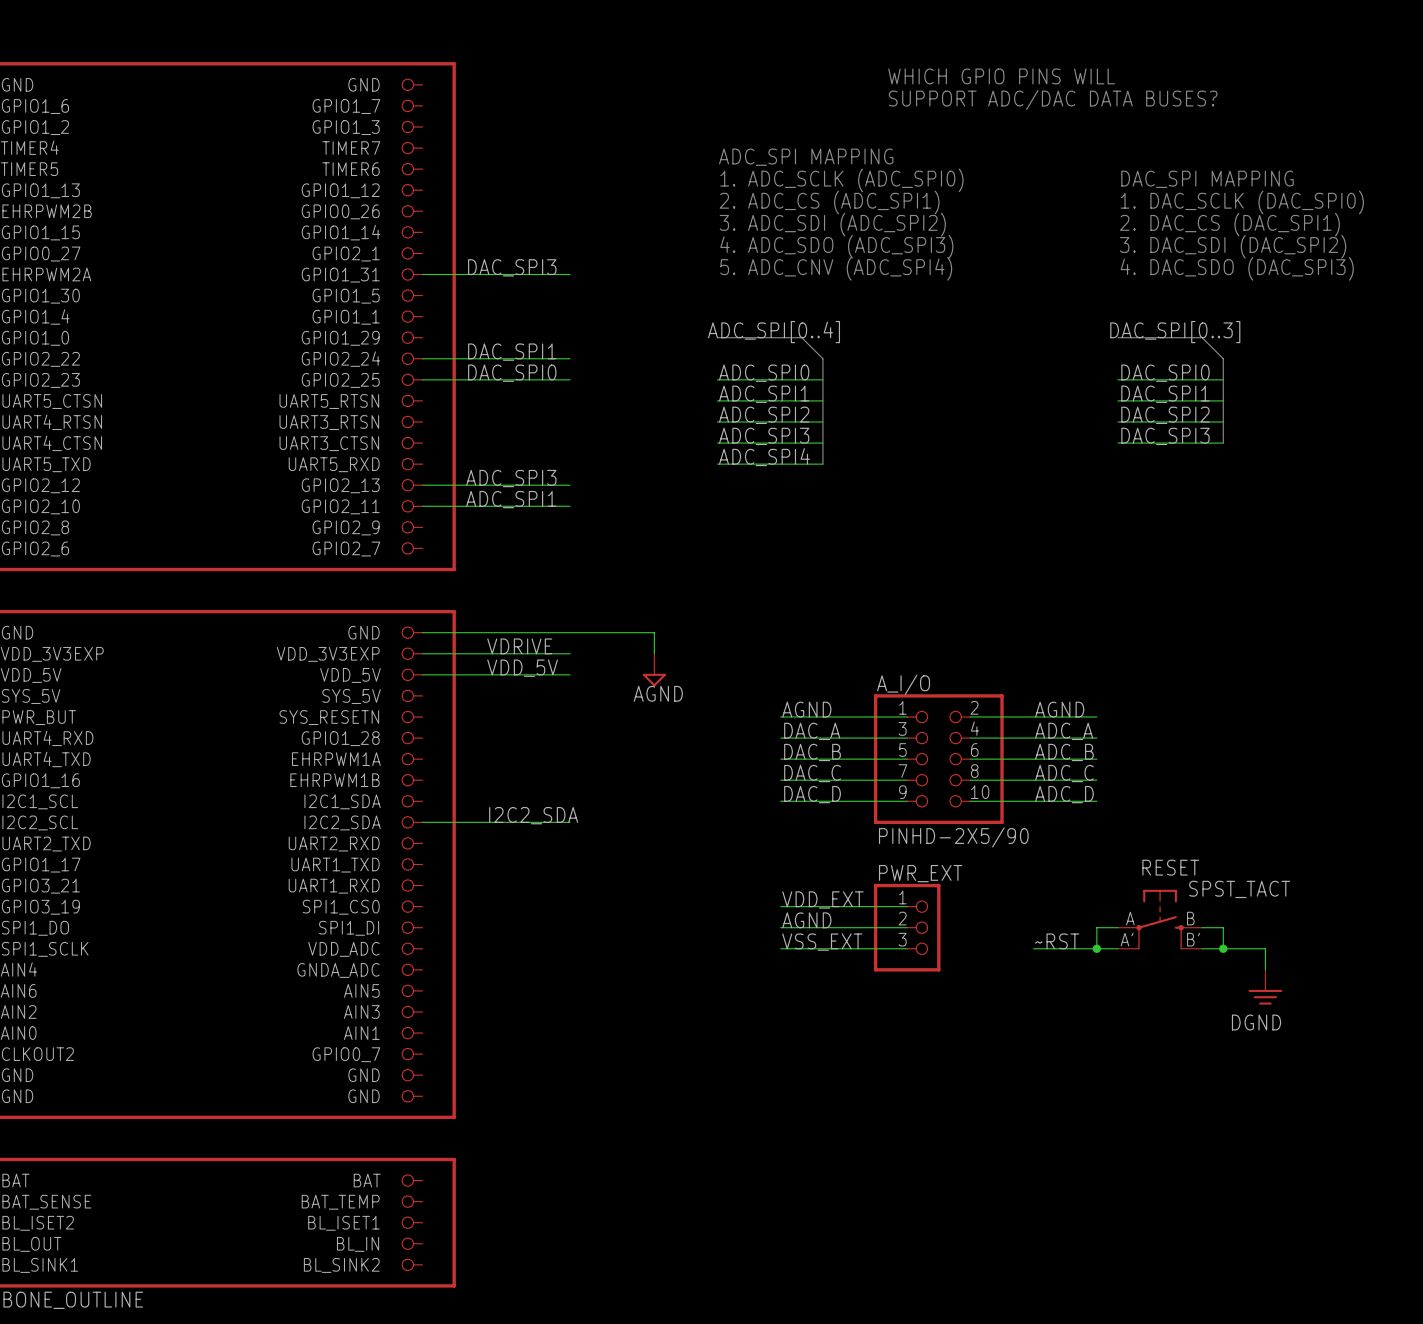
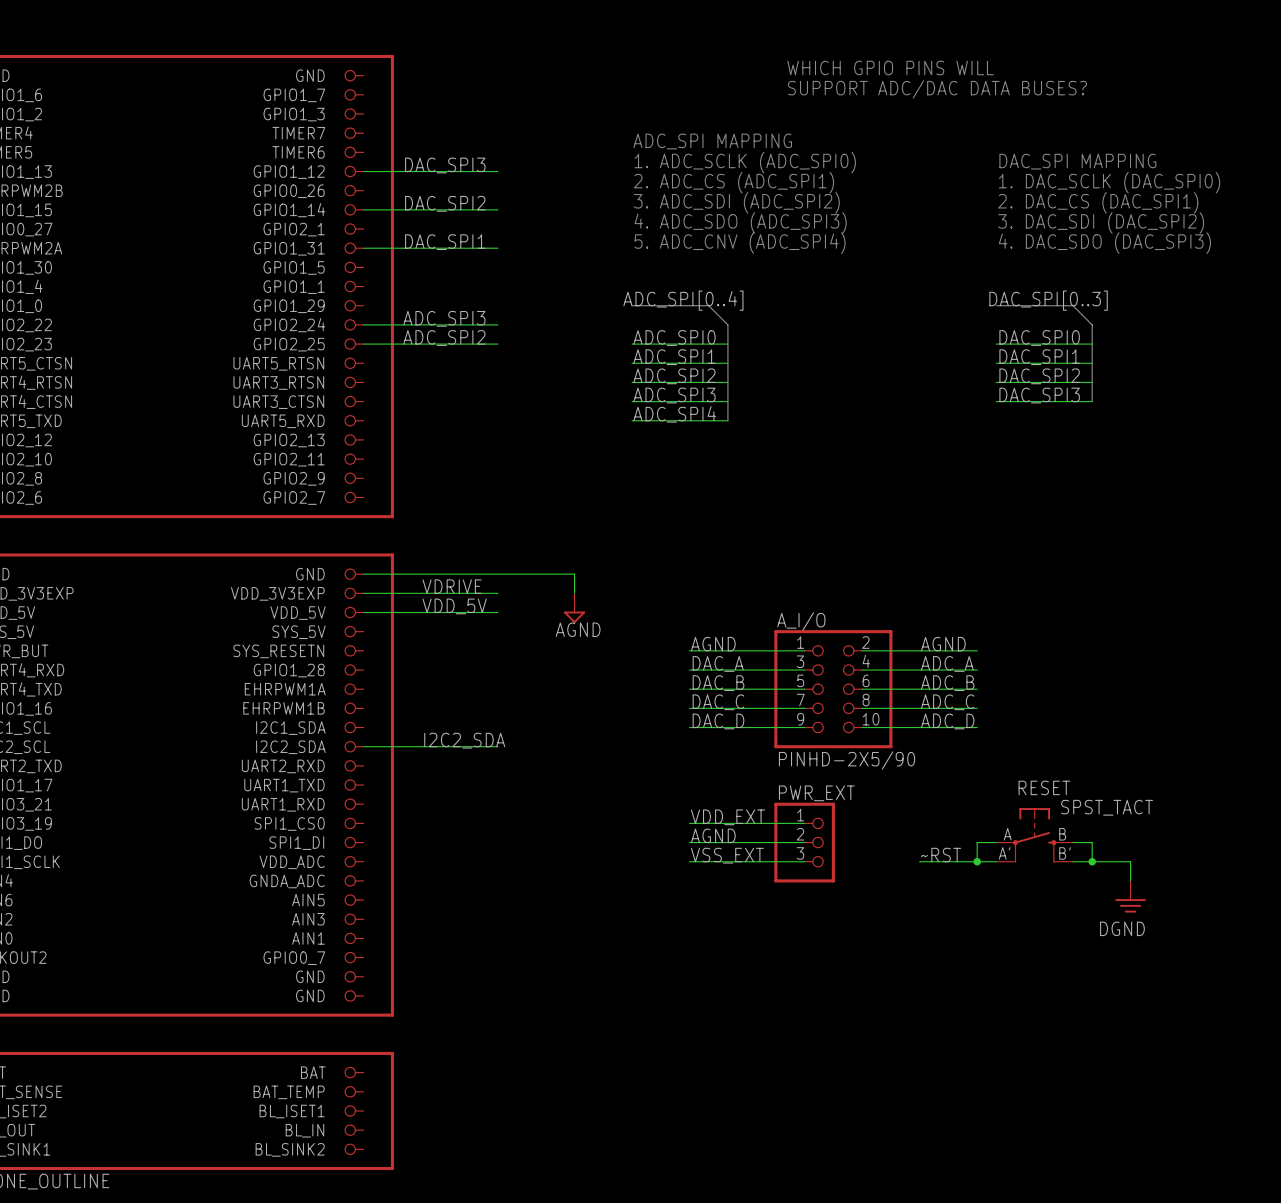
label: none -> DAC_SPI3 (445, 165)
wire: none -> (363, 171) (497, 171)
label: none -> DAC_SPI2 (445, 203)
wire: none -> (363, 209) (497, 209)
label: DAC_SPI3 (512, 267) -> DAC_SPI1 (445, 242)
label: DAC_SPI1 (512, 352) -> ADC_SPI3 (444, 318)
label: DAC_SPI0 (512, 373) -> ADC_SPI2 (444, 338)
label: ADC_SPI3 (511, 478) -> none
wire: (422, 485) (570, 485) -> none
label: ADC_SPI1 (511, 499) -> none
wire: (422, 506) (570, 506) -> none

